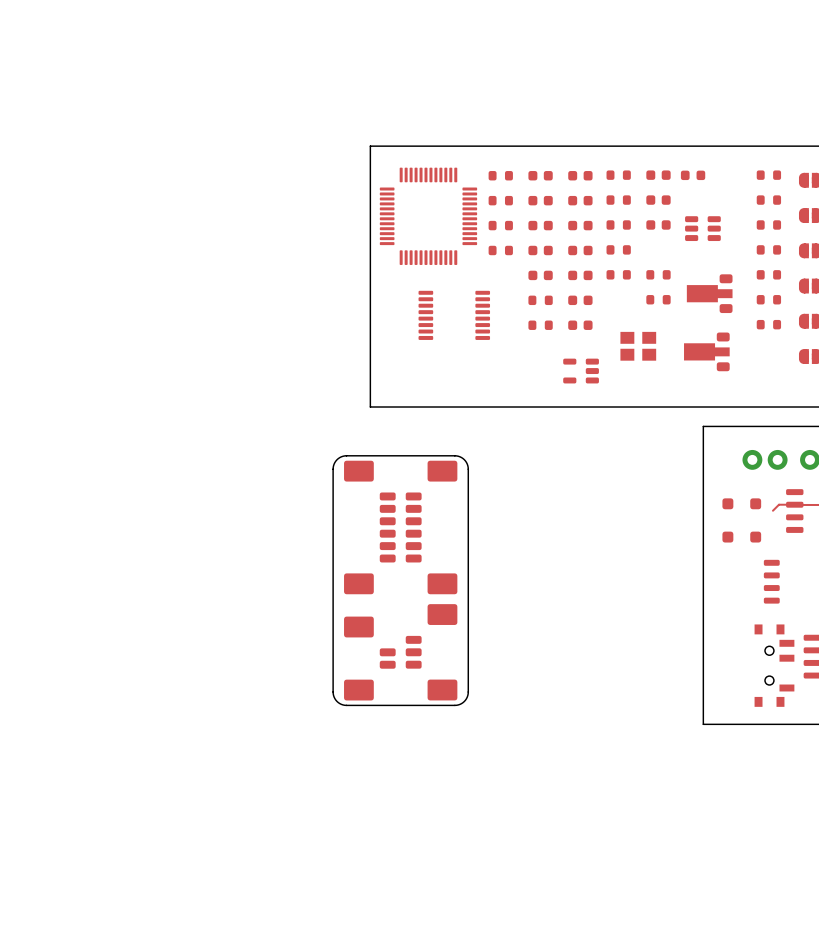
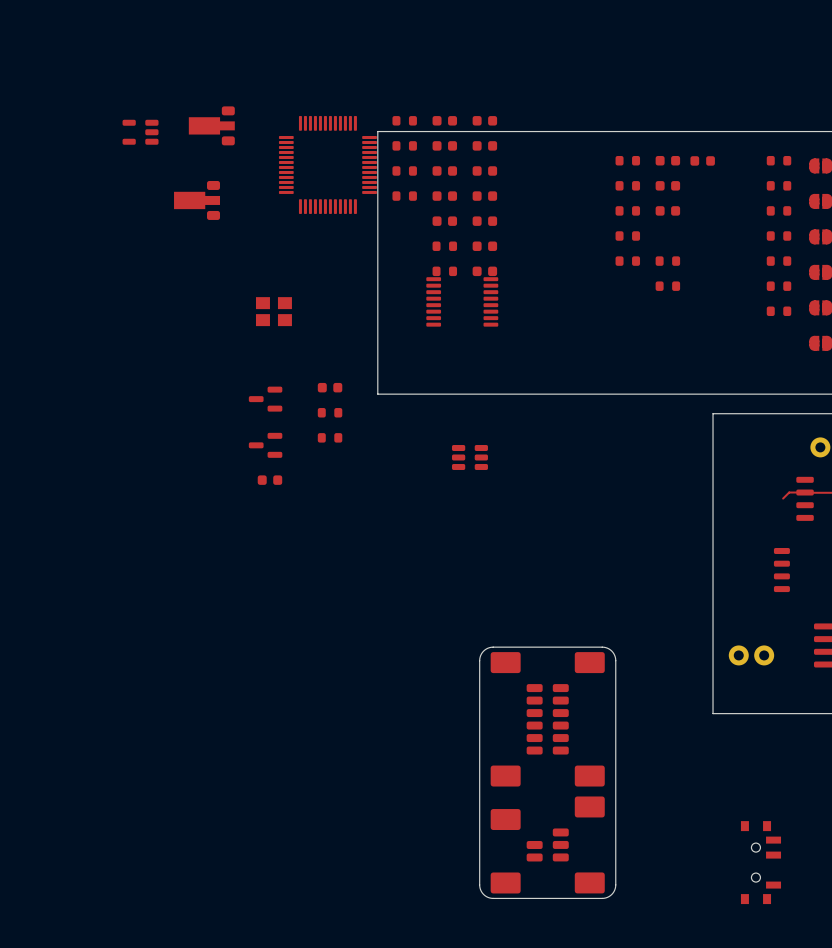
part: none -> (404, 120)
part: none -> (444, 120)
part: none -> (484, 120)
part: none -> (211, 125)
part: none -> (140, 132)
part: none -> (404, 145)
part: none -> (444, 145)
part: none -> (484, 145)
part: (500, 175) -> none
part: (540, 175) -> none
part: (580, 175) -> none
part: none -> (404, 170)
part: none -> (444, 170)
part: none -> (484, 170)
part: (500, 200) -> none
part: (540, 200) -> none
part: (580, 200) -> none
part: none -> (404, 196)
part: none -> (444, 196)
part: none -> (484, 196)
part: none -> (197, 200)
part position: (428, 216) -> (327, 164)
part: (500, 225) -> none
part: (540, 225) -> none
part: (580, 225) -> none
part: (702, 228) -> none
part: none -> (444, 221)
part: none -> (484, 221)
part: (500, 250) -> none
part: (540, 250) -> none
part: (580, 250) -> none
part: none -> (444, 246)
part: none -> (484, 246)
part: (540, 275) -> none
part: (580, 275) -> none
part: none -> (444, 271)
part: none -> (484, 271)
part: (709, 293) -> none
part: (540, 300) -> none
part: (580, 300) -> none
part: none -> (273, 311)
part: (540, 325) -> none
part: (580, 325) -> none
part: (638, 346) -> none
part: (706, 351) -> none
part: (581, 371) -> none
part: none -> (330, 387)
part: none -> (265, 399)
part: none -> (330, 412)
part: none -> (330, 437)
board edge: (454, 455) (344, 455) (338, 458) (334, 464) (333, 691) (334, 698) (341, 704) (454, 705) (463, 702) (467, 697) (468, 469) (464, 459) (454, 455) -> (602, 647) (491, 647) (484, 649) (480, 655) (479, 884) (482, 893) (488, 897) (602, 898) (609, 896) (614, 890) (615, 660) (611, 651) (602, 647)
part: none -> (265, 445)
part: (765, 459) -> none
part: none -> (469, 457)
part: none -> (269, 480)
part: (741, 503) -> none
part: (369, 527) -> none
part: (431, 527) -> none
part: (741, 537) -> none
part position: (431, 652) -> (578, 844)
part position: (369, 658) -> (516, 851)
part position: (774, 665) -> (760, 862)
part: none -> (751, 655)
part: none -> (516, 719)
part: none -> (578, 719)

